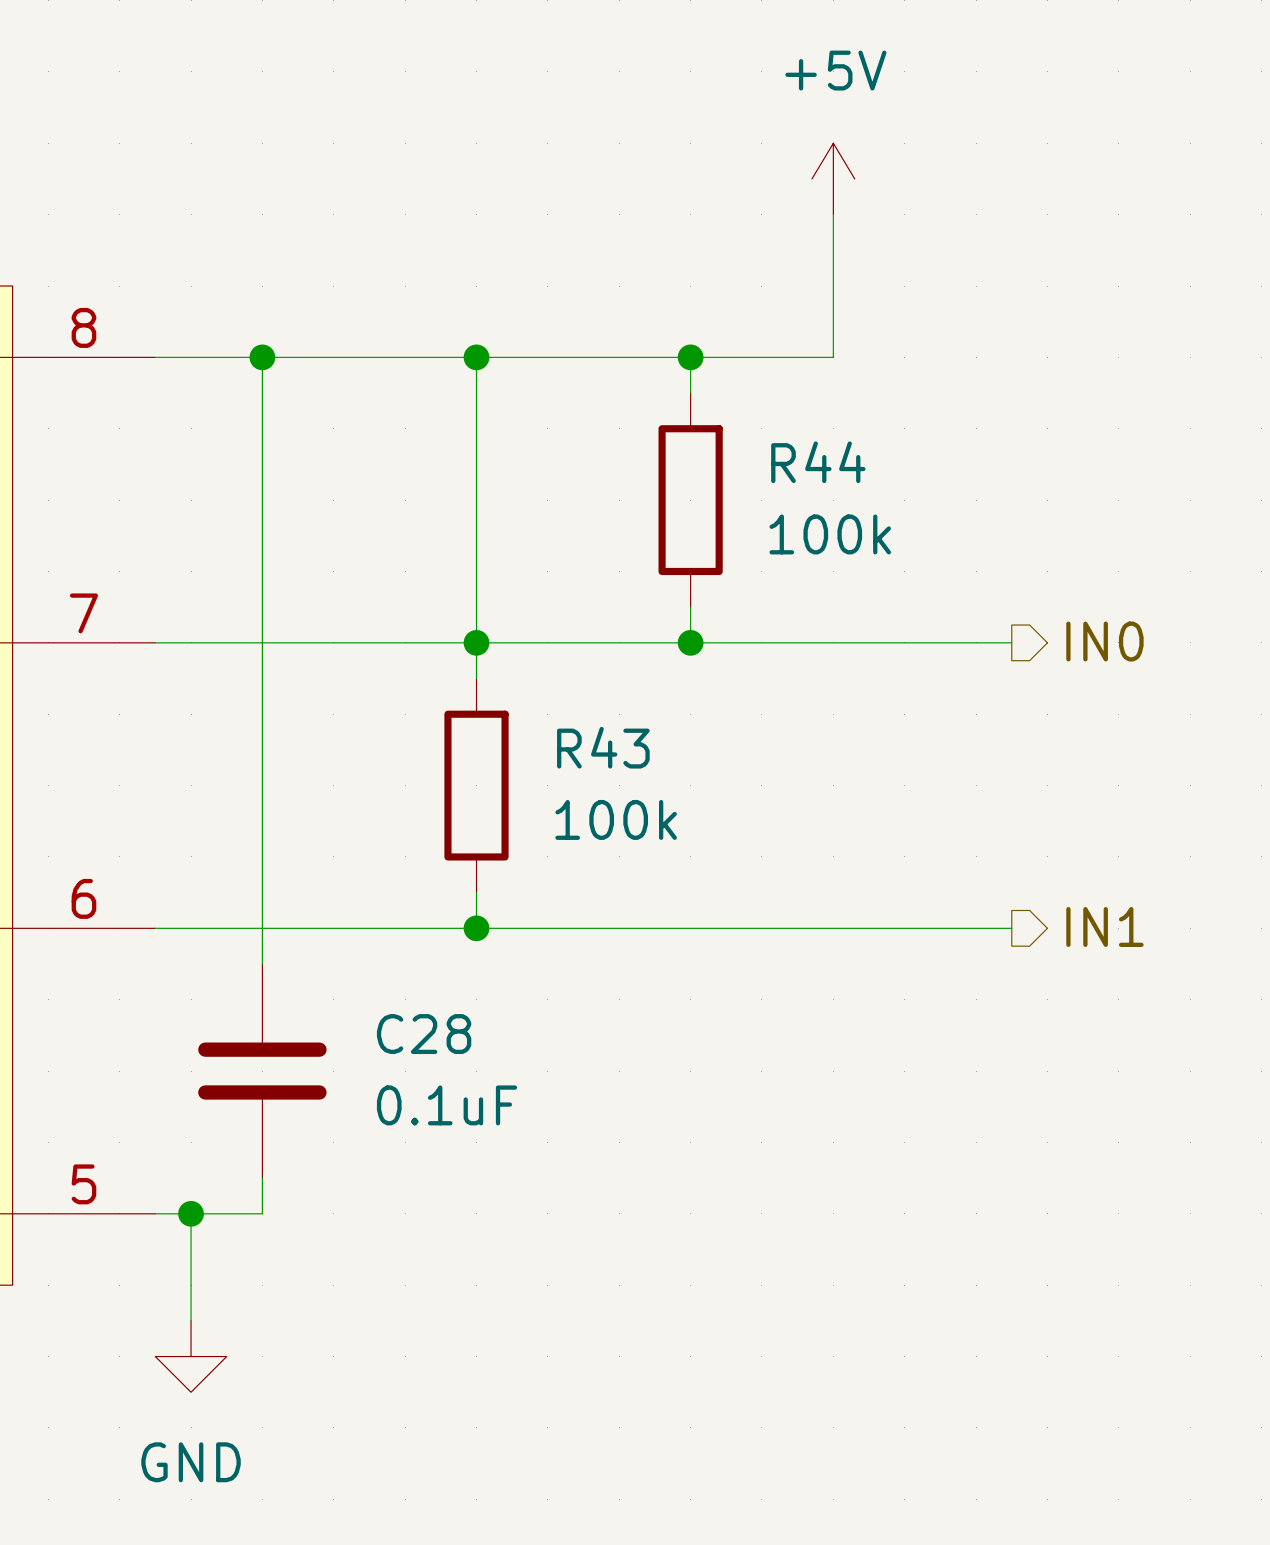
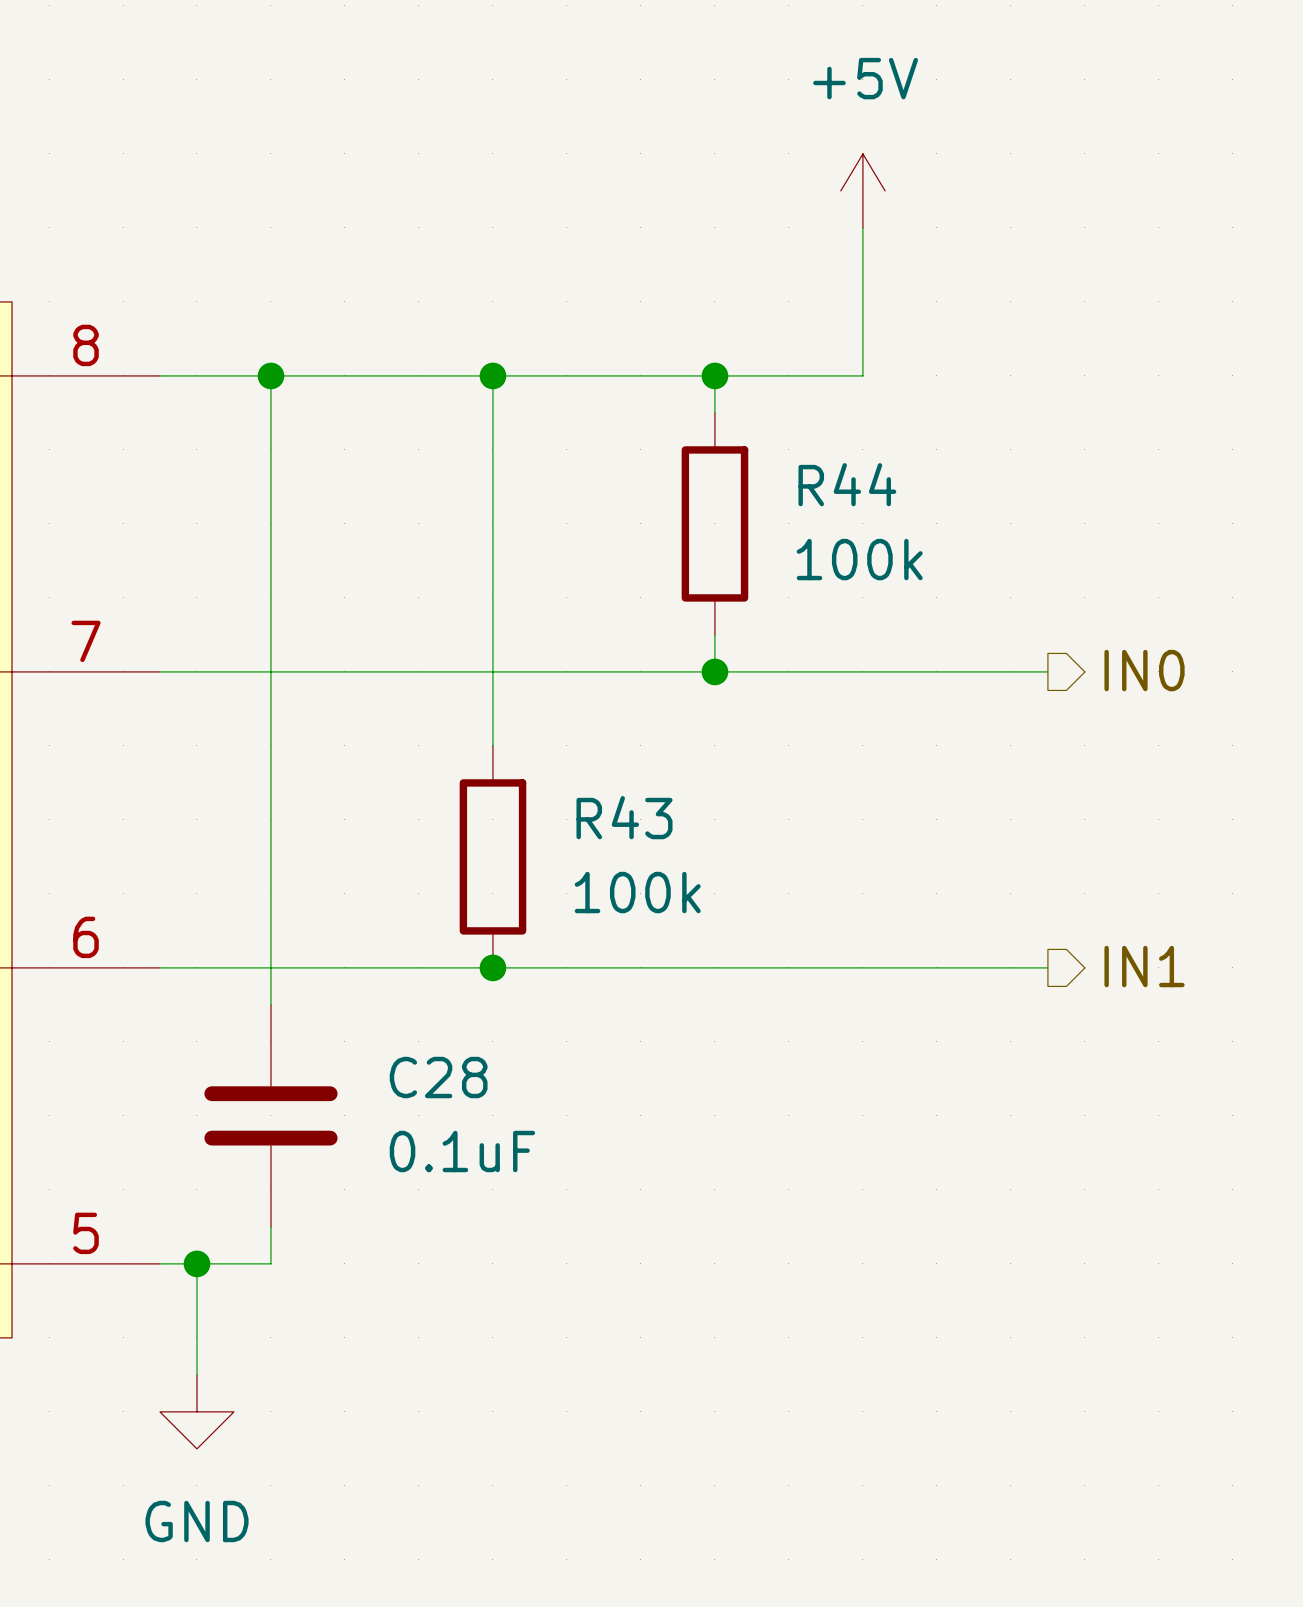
junction: (476, 642) -> none
R43 position: (476, 785) -> (492, 856)

